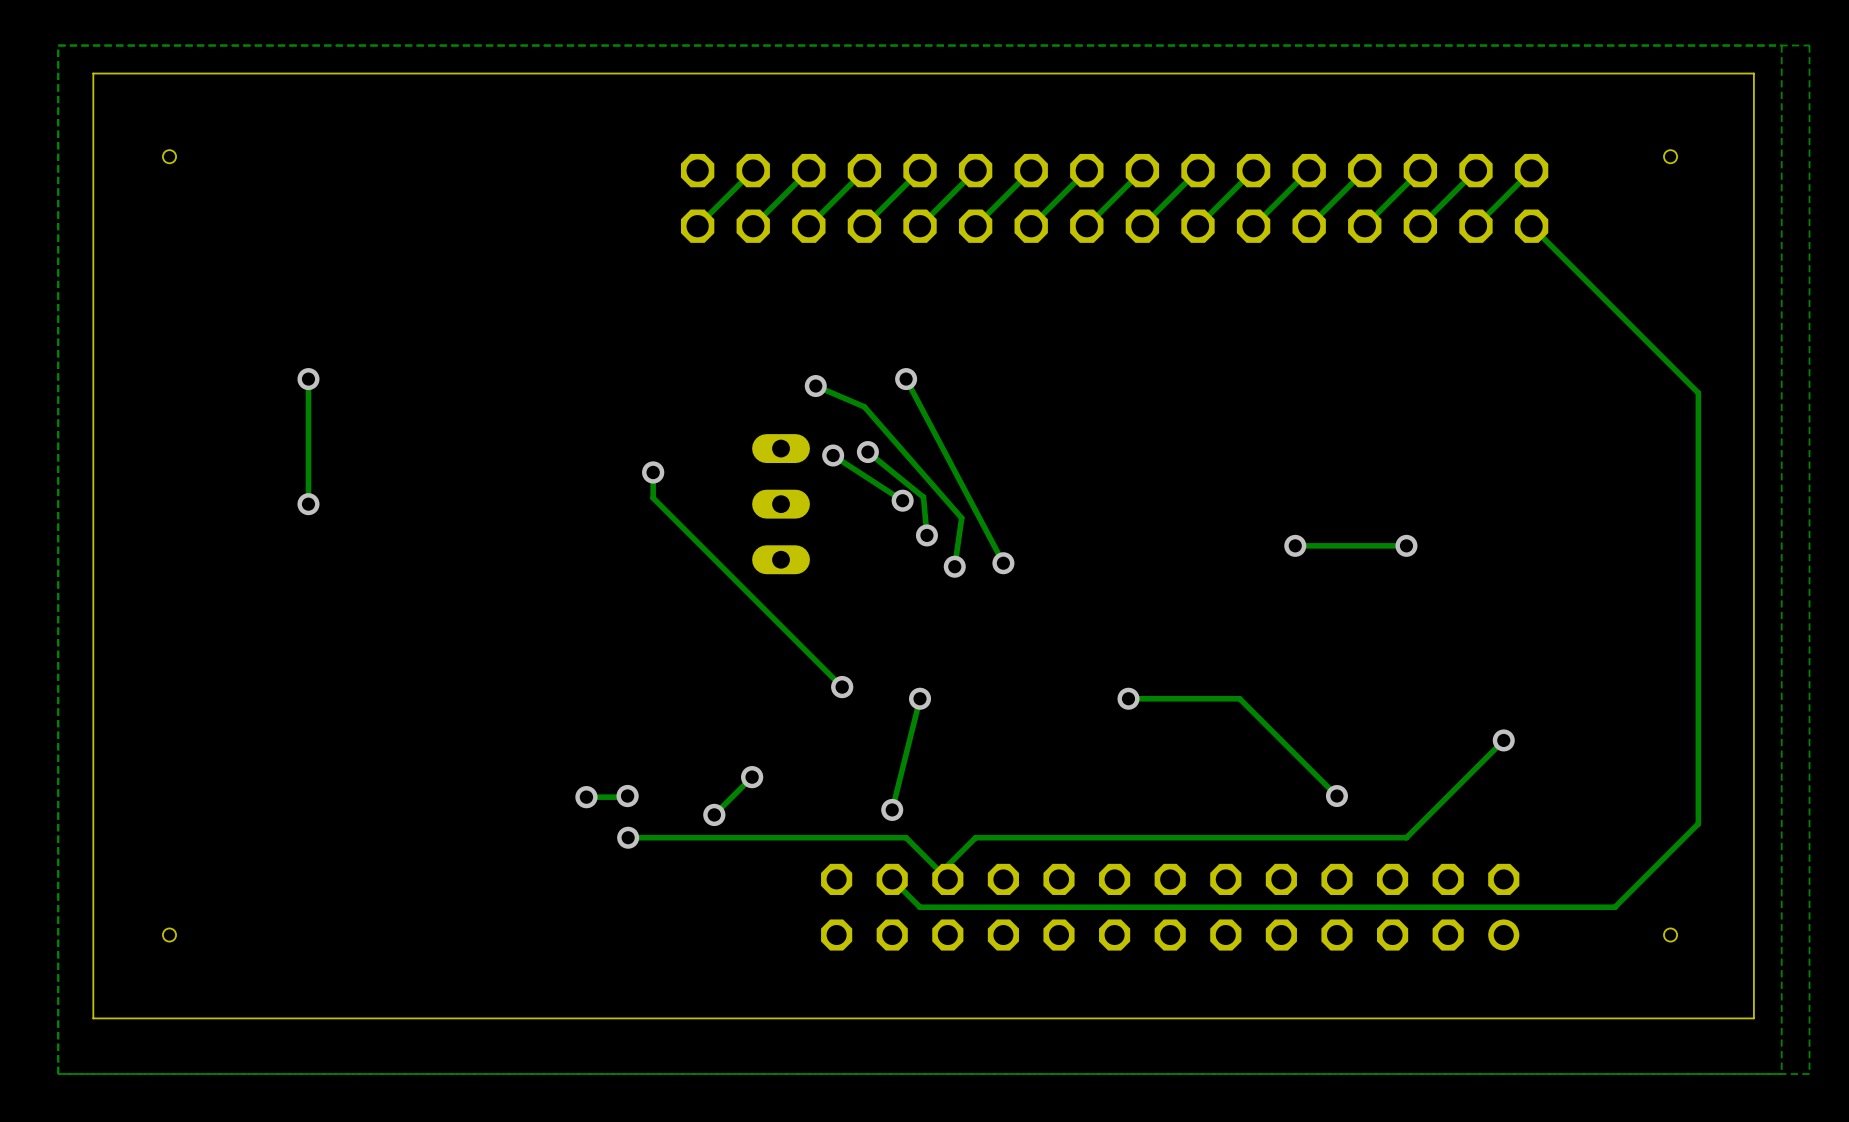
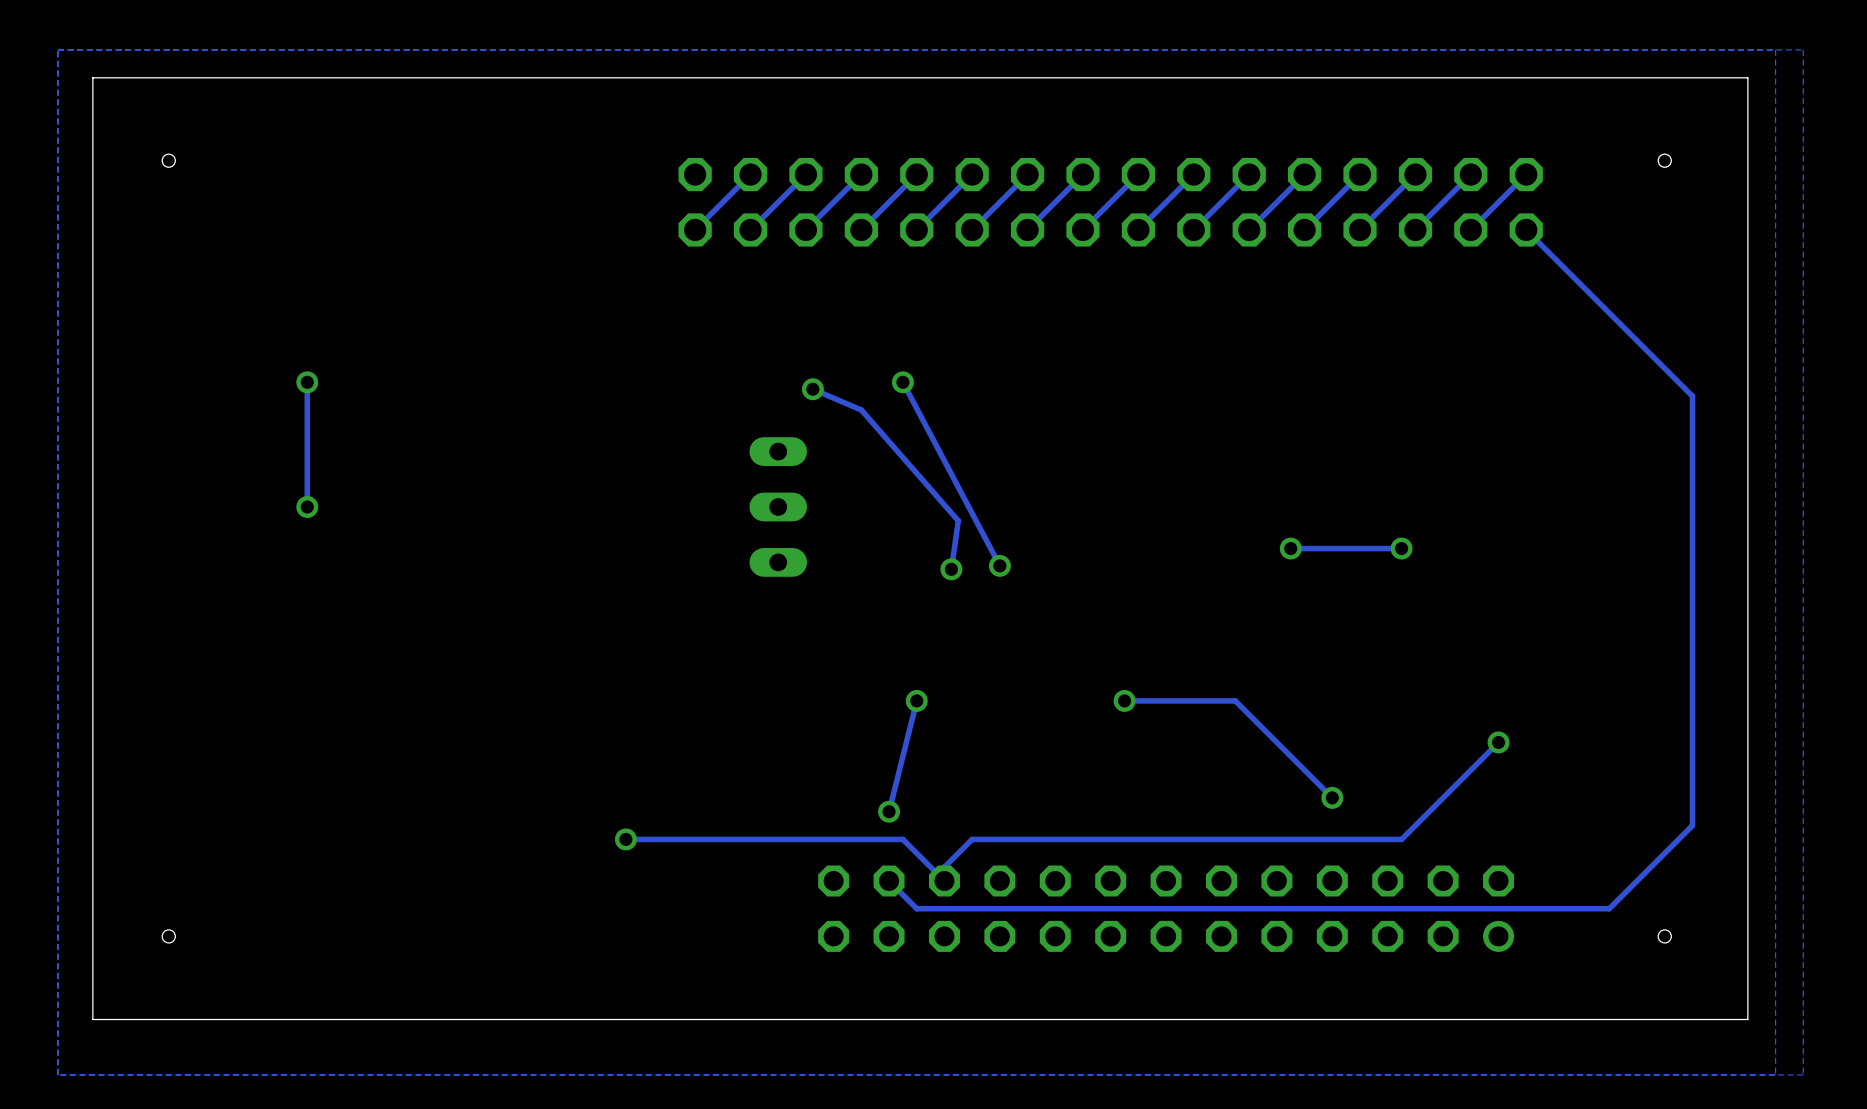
track: (867, 452) (923, 497) (926, 535) -> none
via: (867, 452) -> none
track: (833, 455) (902, 500) -> none
via: (833, 455) -> none
track: (653, 472) (653, 498) (842, 687) -> none
via: (653, 472) -> none
via: (902, 500) -> none
via: (926, 535) -> none
via: (842, 687) -> none
track: (752, 777) (714, 814) -> none
via: (752, 777) -> none
track: (627, 796) (586, 797) -> none
via: (627, 796) -> none
via: (586, 797) -> none
via: (714, 814) -> none

